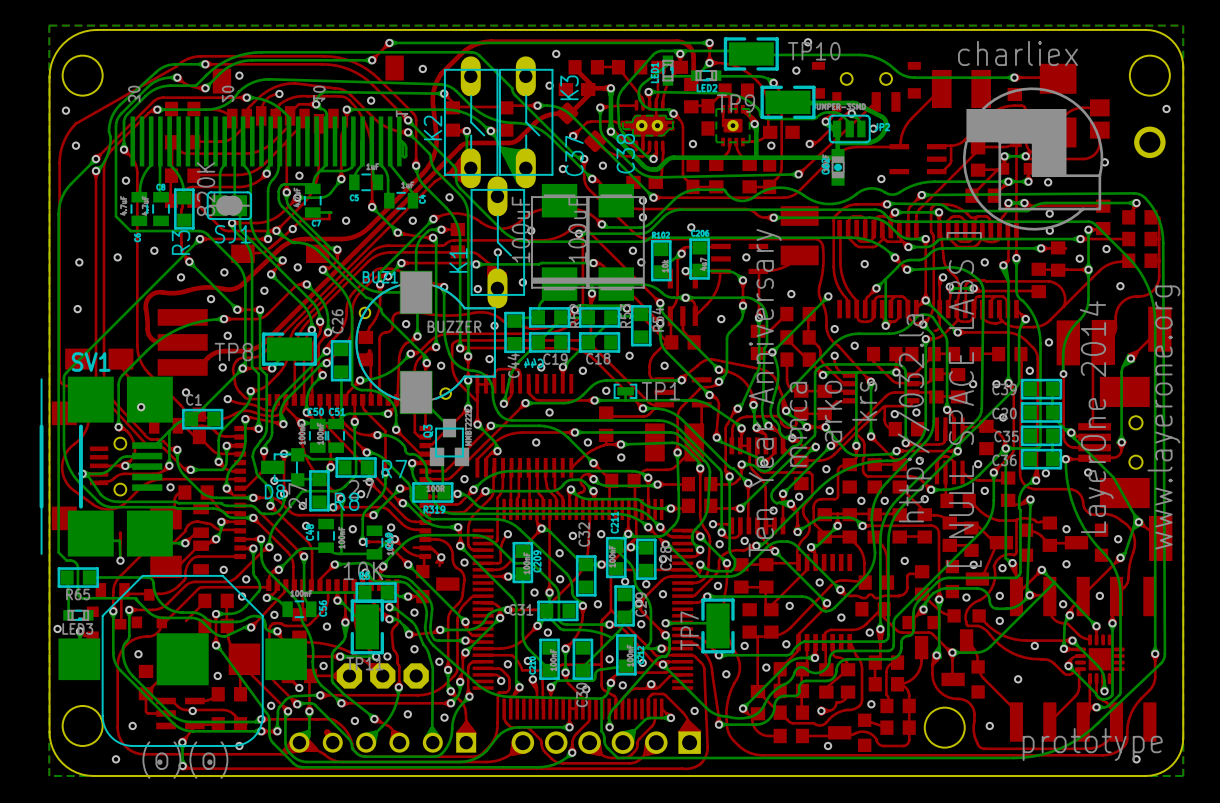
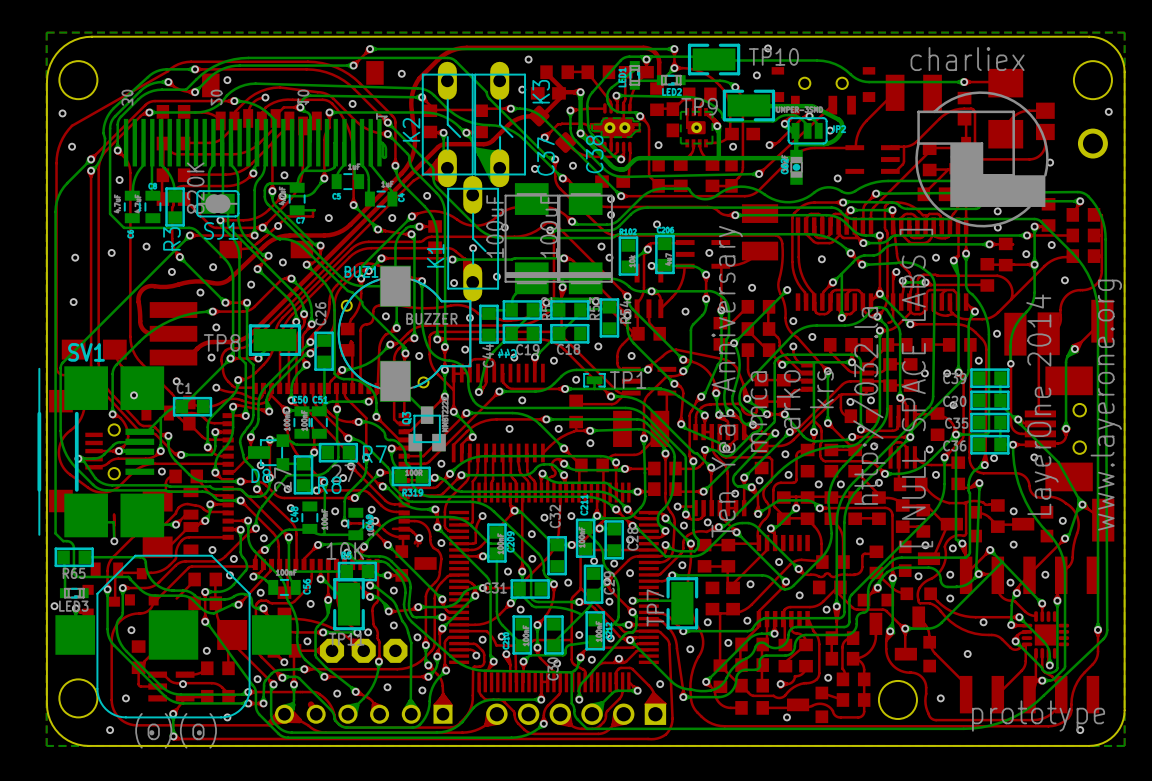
drawing: [962, 87, 1104, 231] -> none
line: none -> (934, 111) (951, 99) (972, 93) (993, 93) (1014, 101) (1030, 114) (1042, 133) (1047, 153) (1045, 175)
line: none -> (918, 143) (981, 143) (981, 175) (1013, 175) (1013, 111) (918, 111) (918, 143)
line: none -> (918, 143) (916, 164) (921, 185) (933, 203) (949, 217) (970, 224) (991, 225) (1012, 219) (1029, 206)
drawing: none -> [950, 143, 1046, 207]

